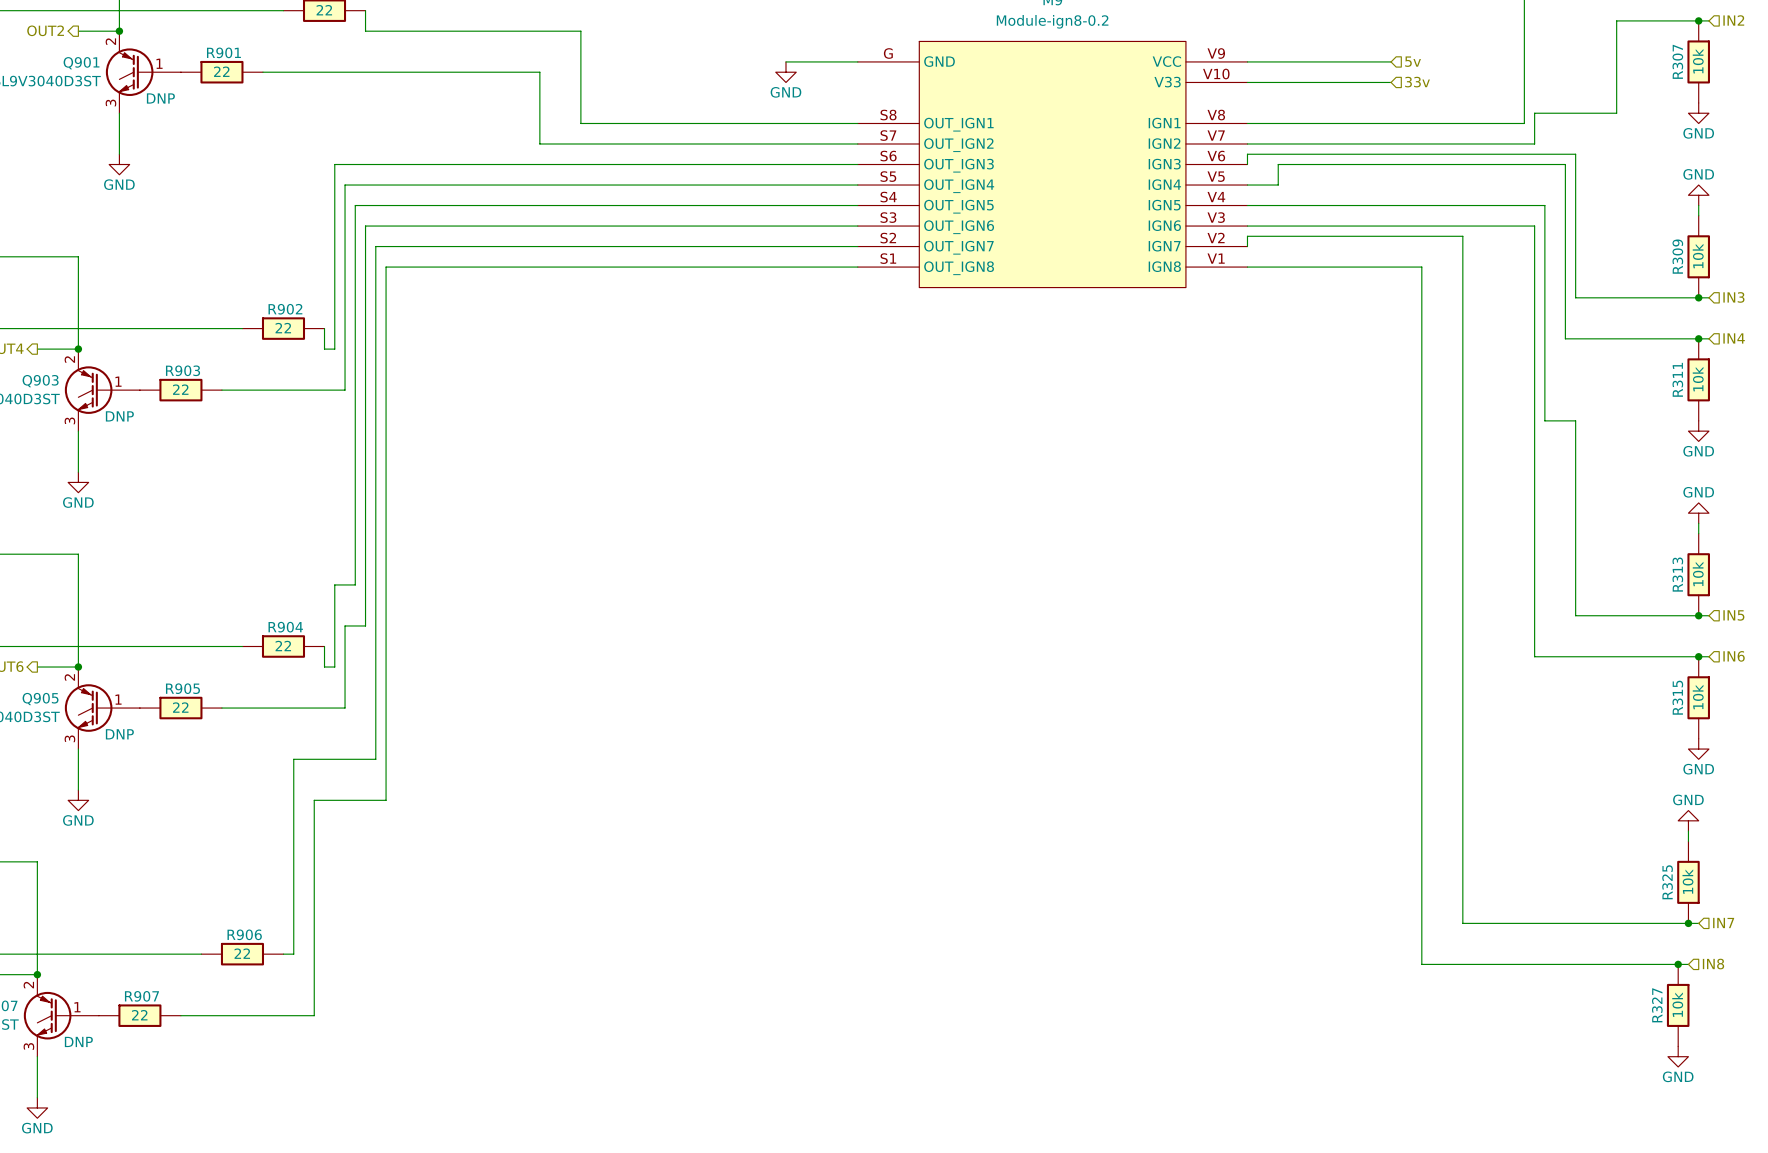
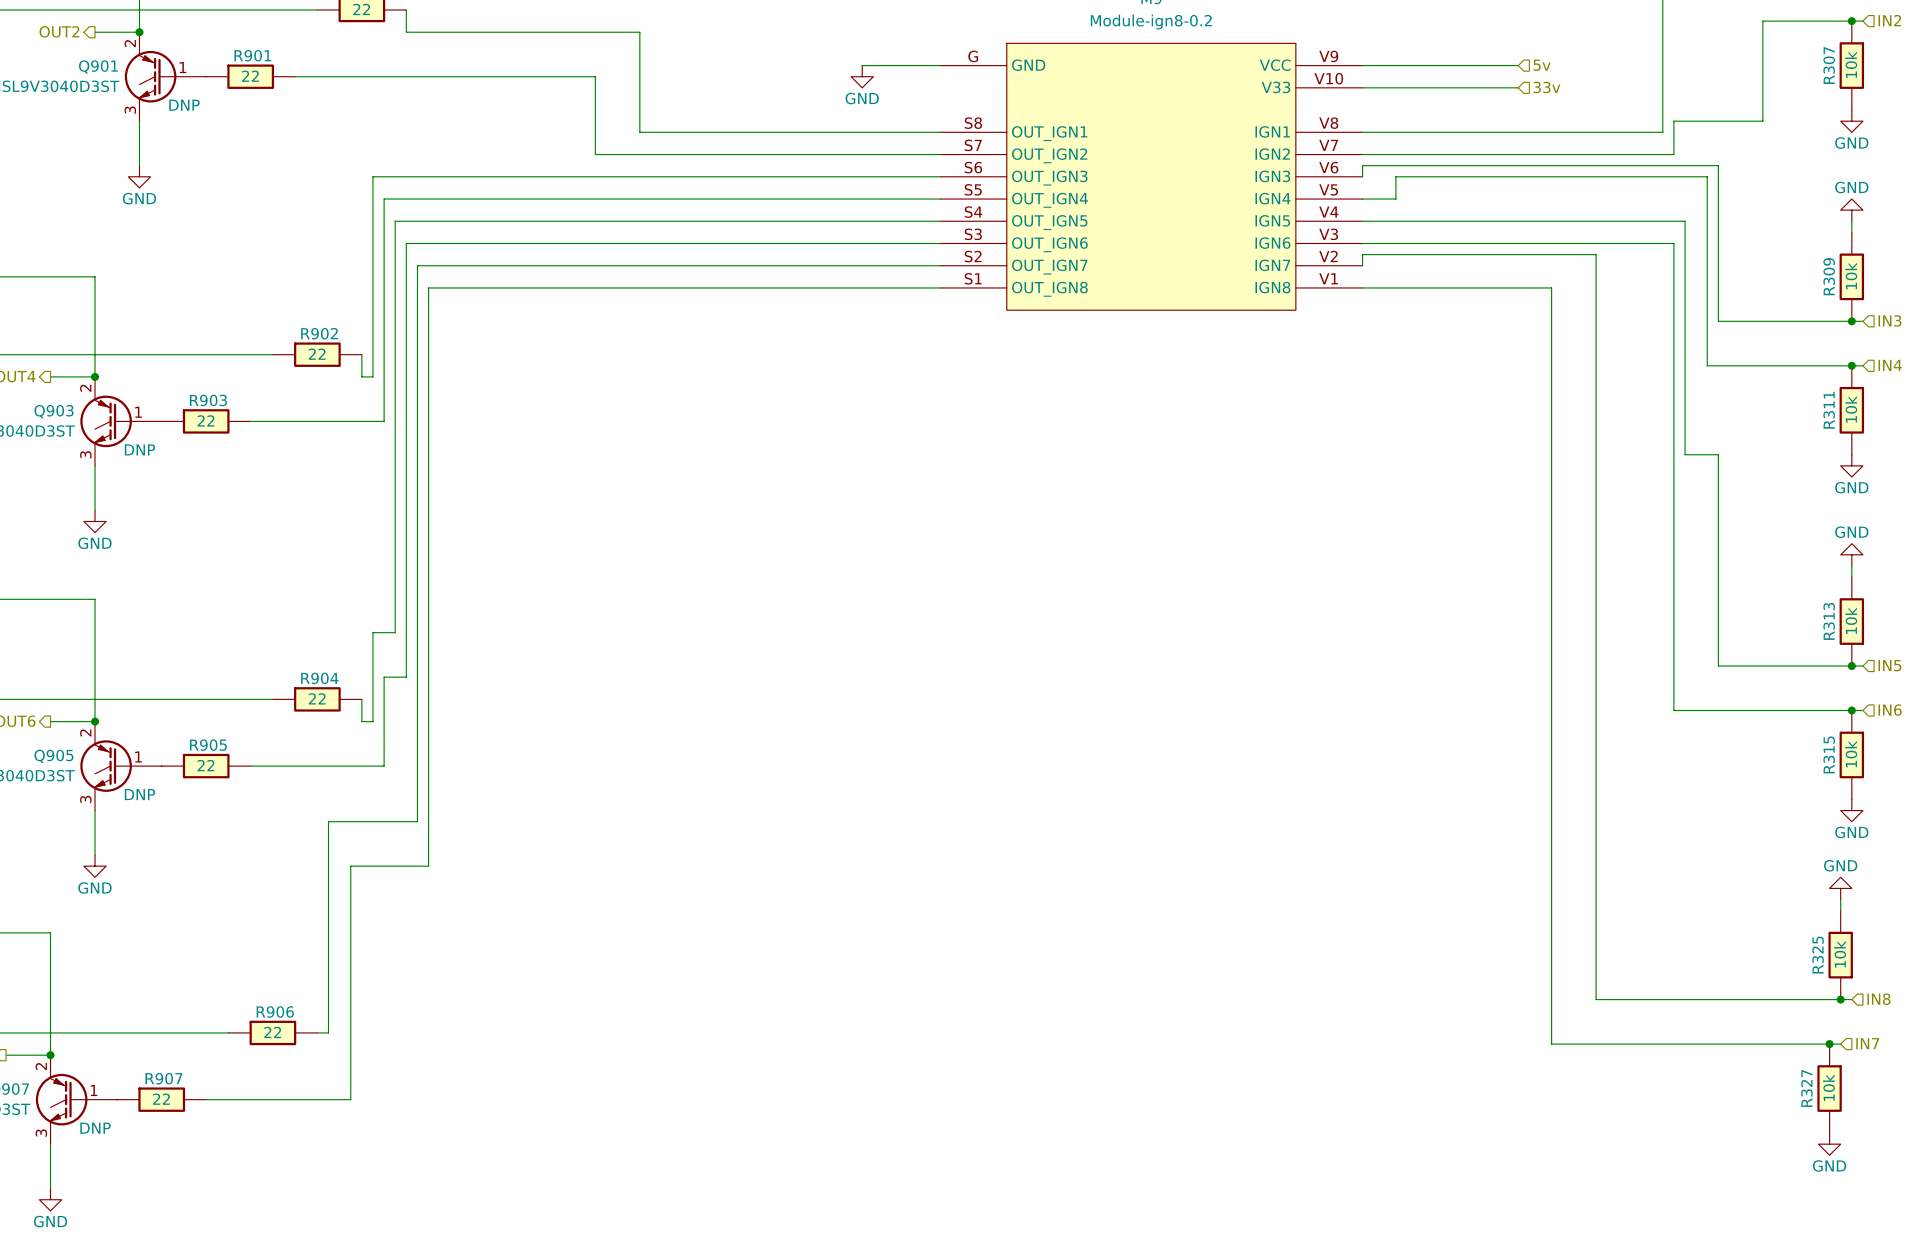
hierarchical label: IN7 (1723, 923) -> IN8 (1878, 999)
hierarchical label: IN8 (1713, 964) -> IN7 (1867, 1043)

